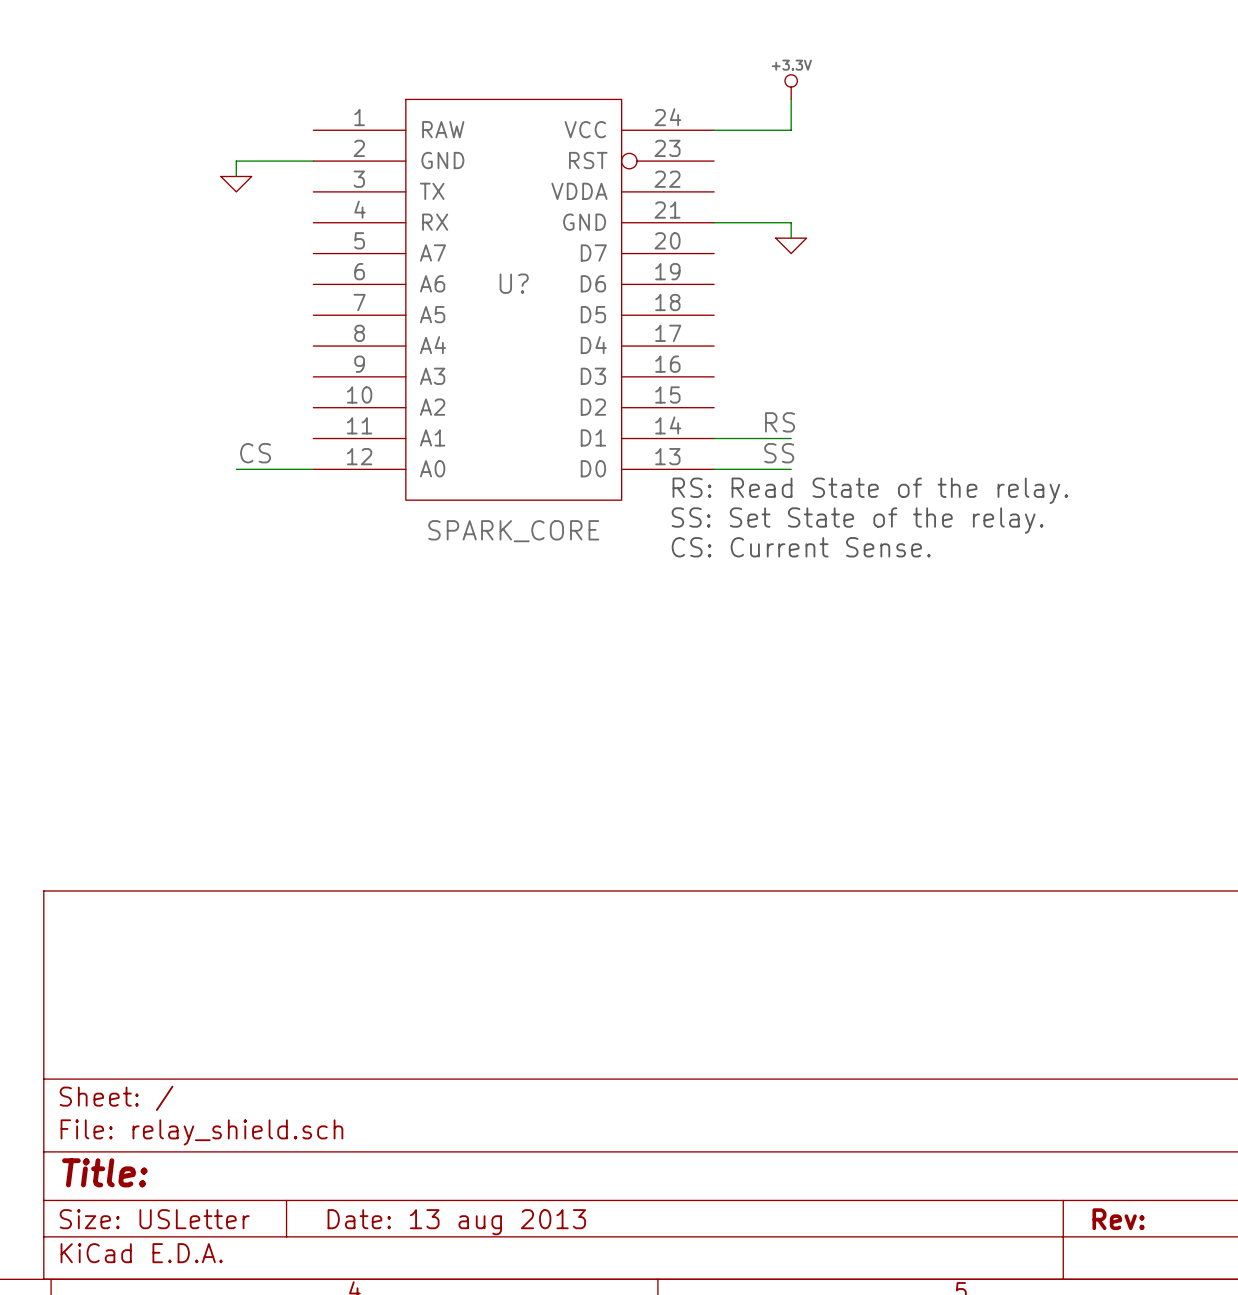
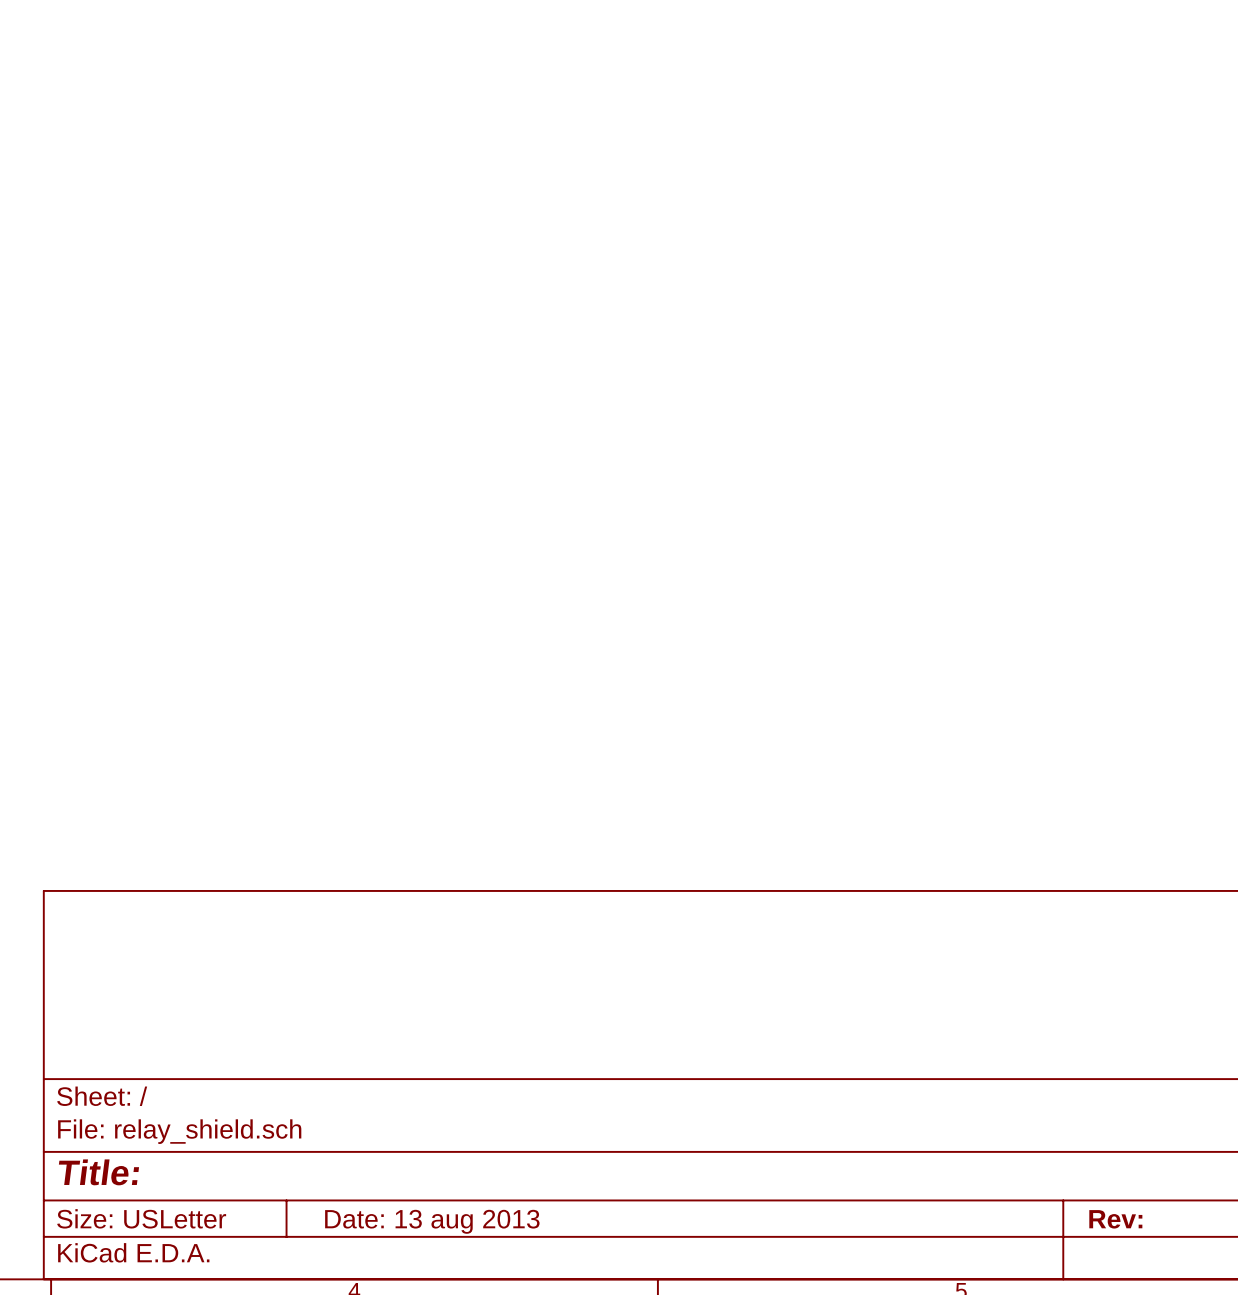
power symbol: +3.3V (791, 87) -> none
wire: (791, 99) (791, 130) (714, 130) -> none
wire: (313, 161) (236, 161) (236, 176) -> none
power symbol: (236, 184) -> none
wire: (714, 222) (791, 222) (791, 238) -> none
power symbol: (791, 245) -> none
U?: SPARK_CORE (513, 299) -> none
label: RS (780, 422) -> none
wire: (714, 438) (791, 438) -> none
label: CS (255, 453) -> none
label: SS (779, 453) -> none
wire: (236, 469) (313, 469) -> none
wire: (714, 469) (791, 469) -> none
text: RS: Read State of the relay. (870, 490) -> none
text: SS: Set State of the relay. (857, 520) -> none
text: CS: Current Sense. (801, 547) -> none

